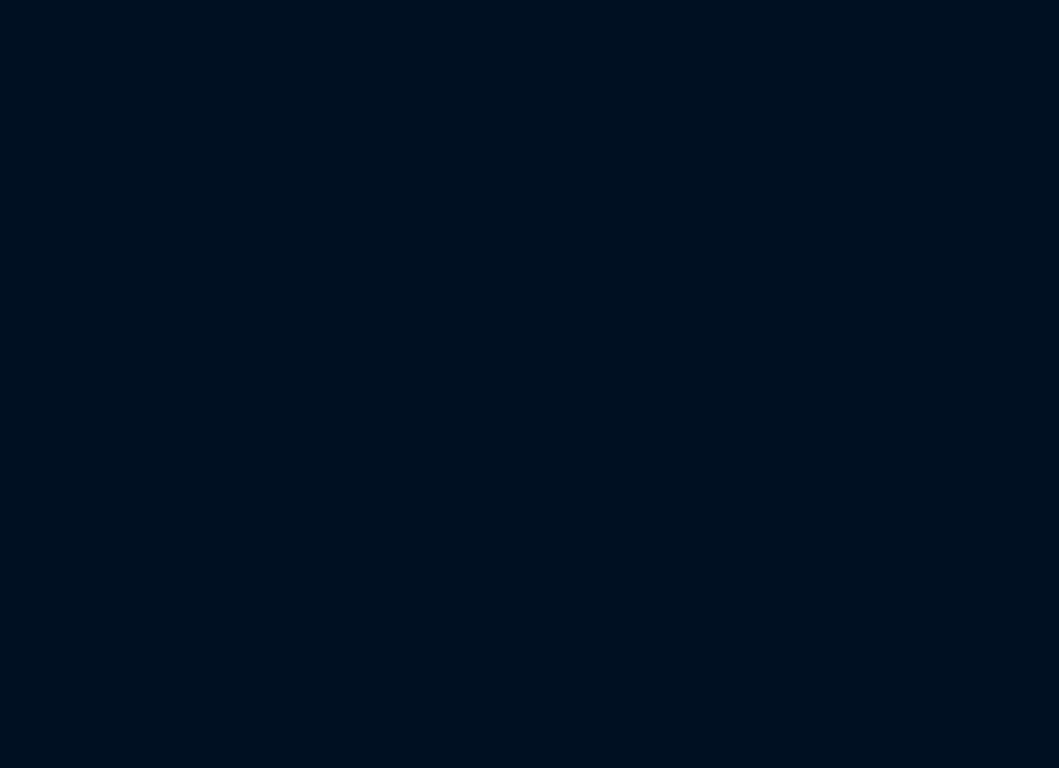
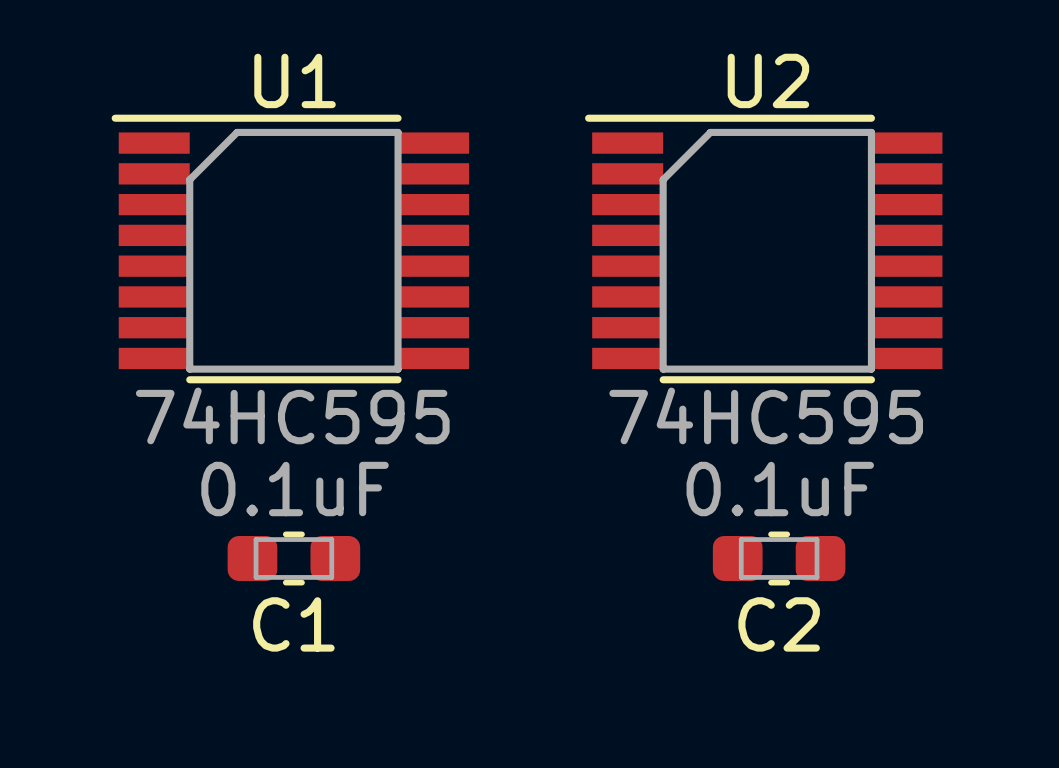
U1: none -> 74HC595 (290, 249)
U2: none -> 74HC595 (763, 249)
C1: none -> 0.1uF (293, 558)
C2: none -> 0.1uF (779, 558)

